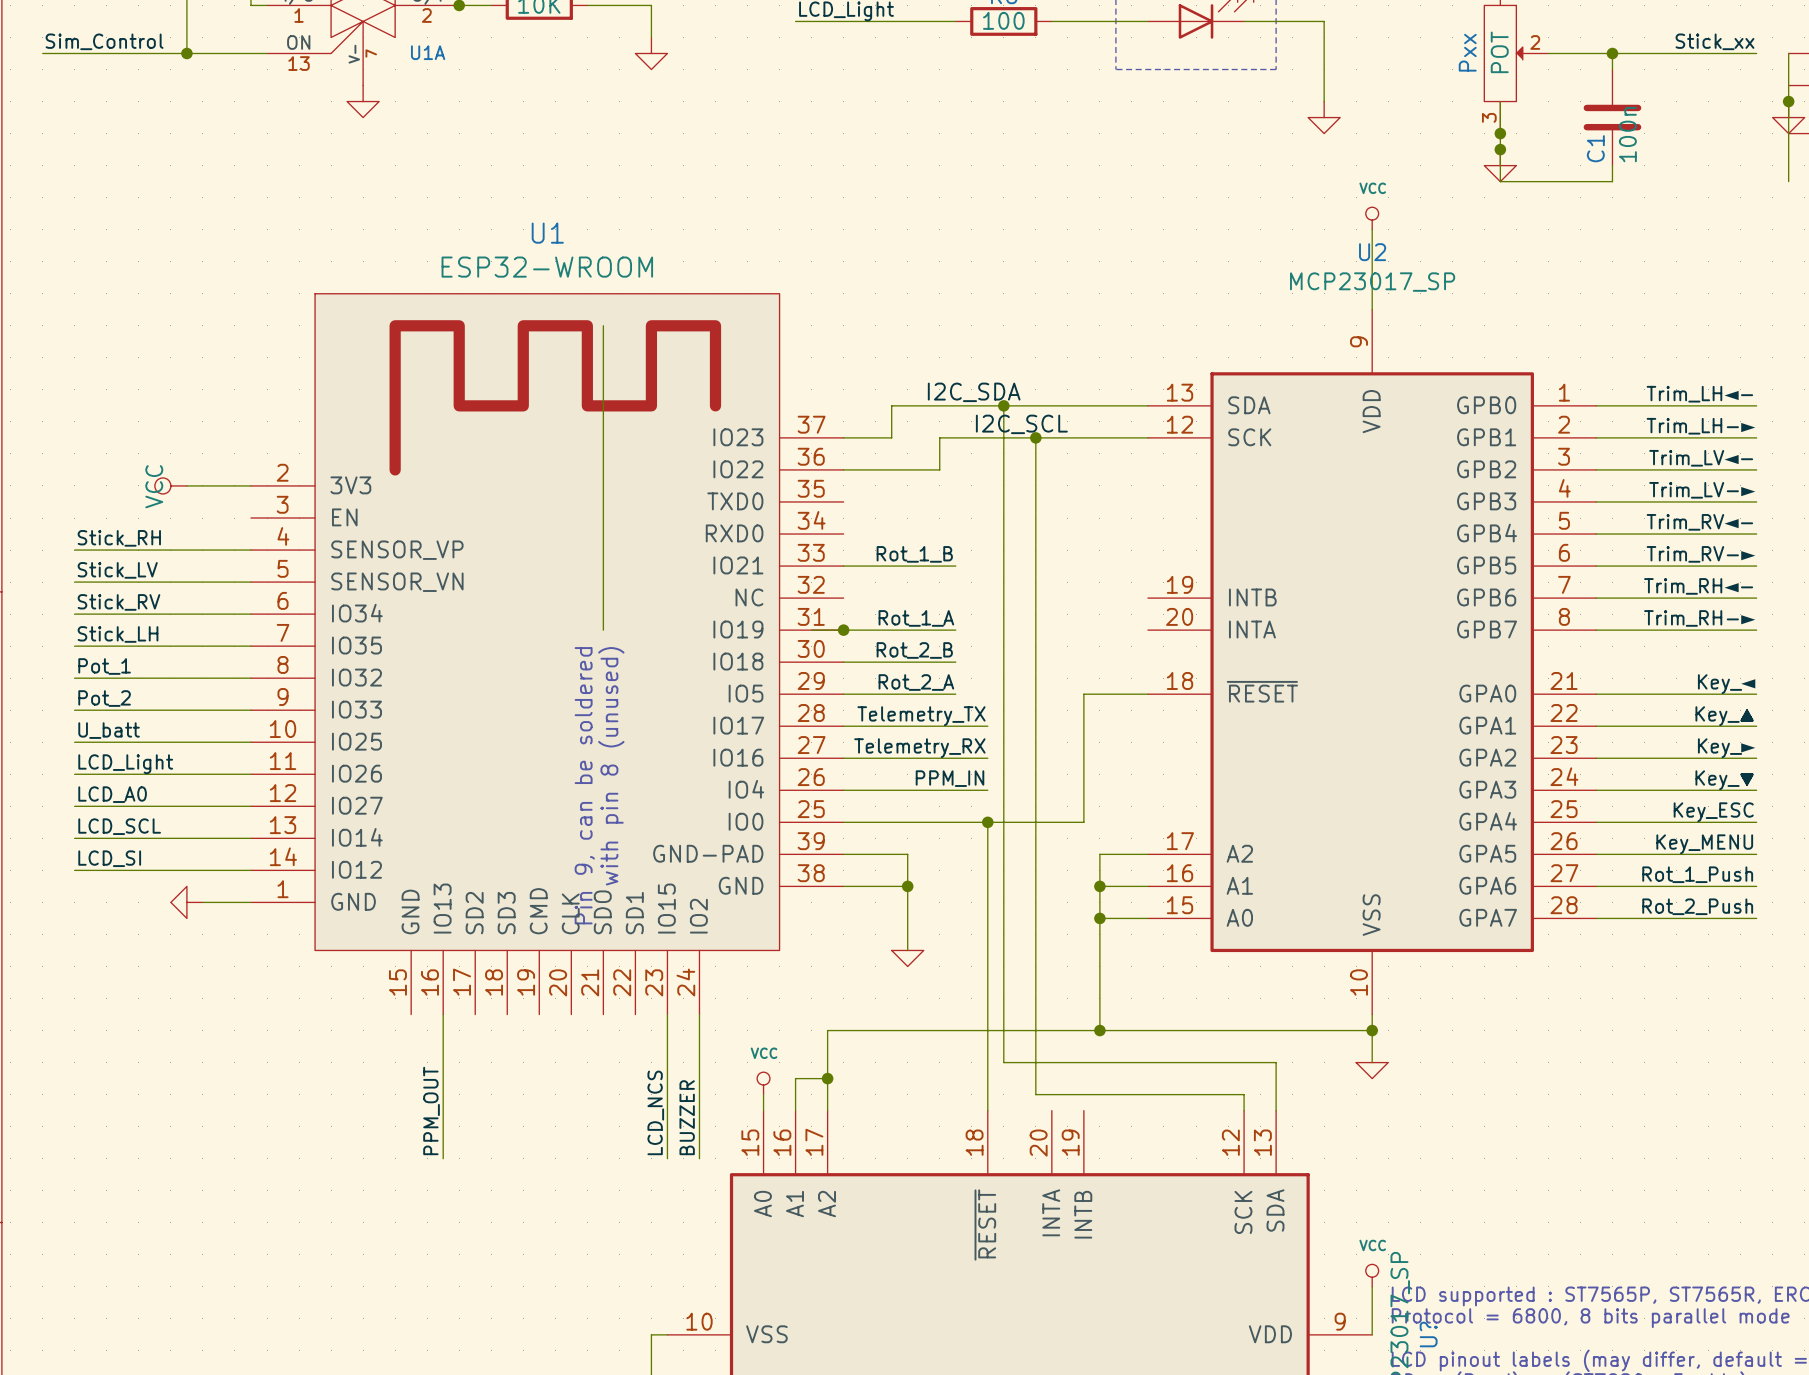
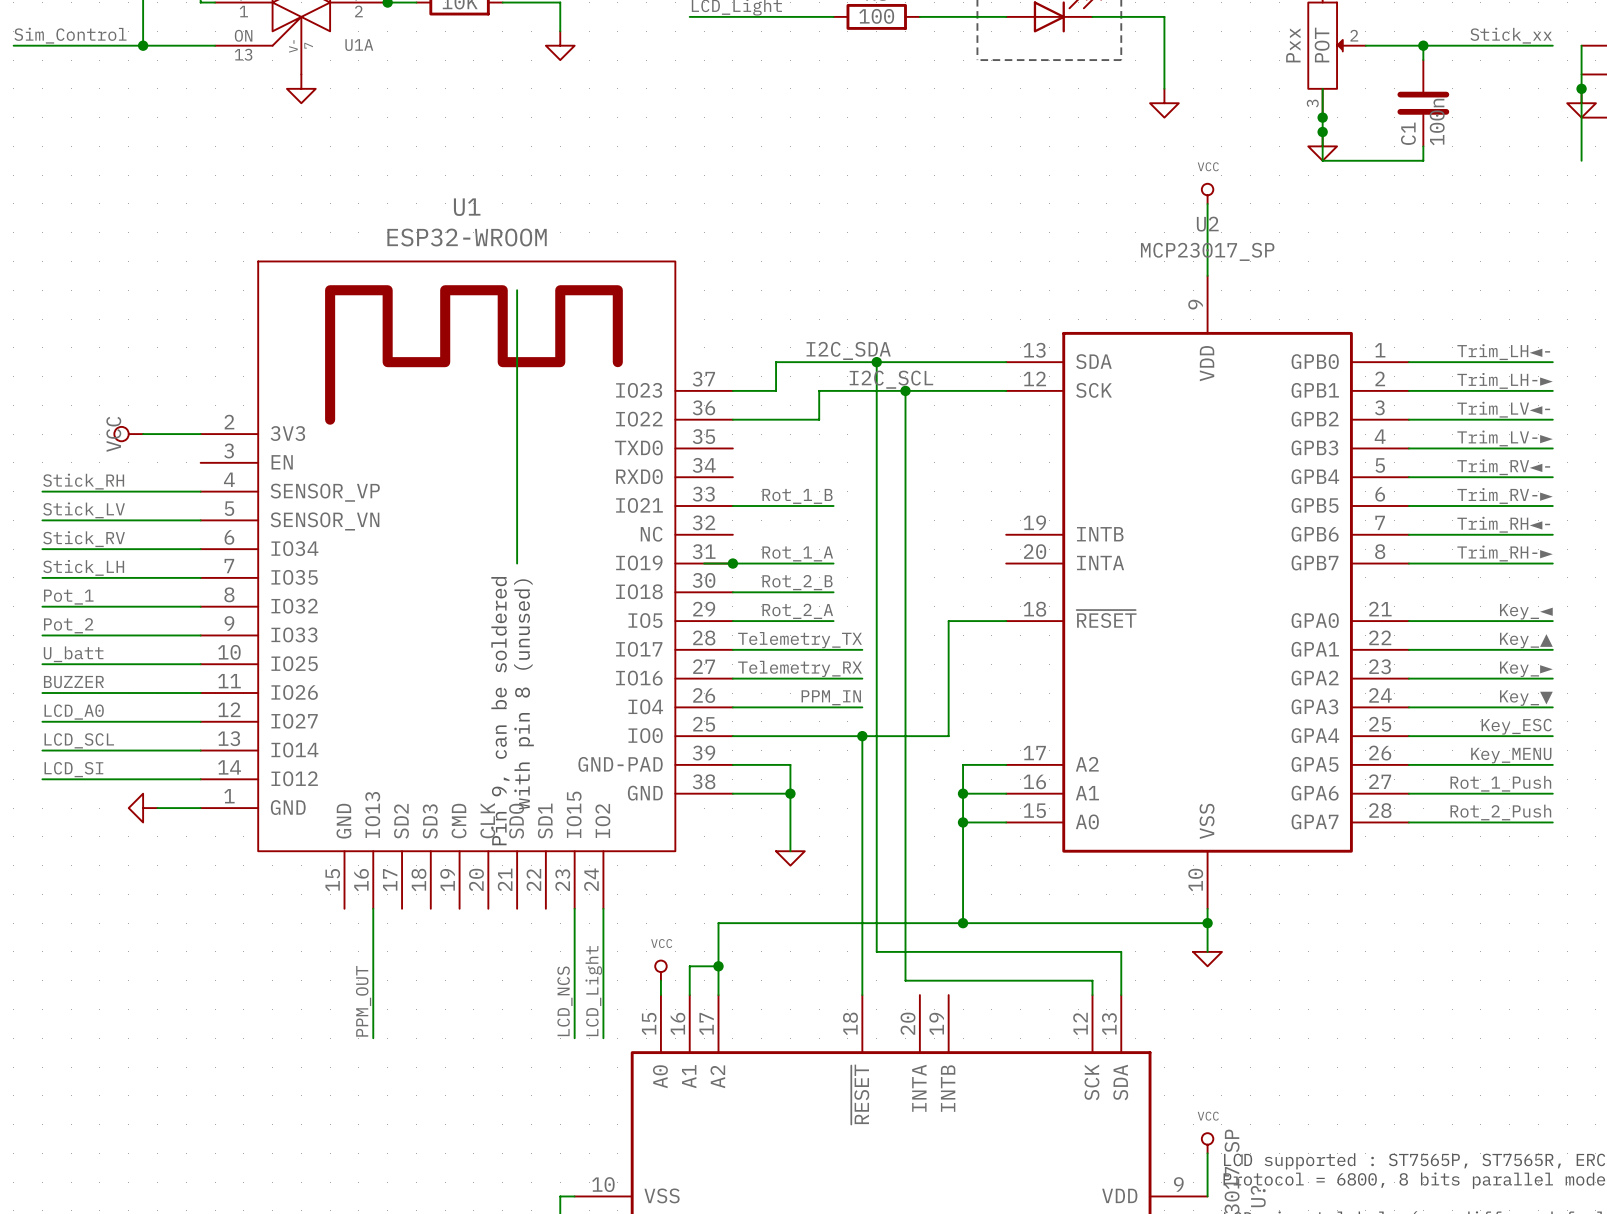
label: LCD_Light (125, 764) -> BUZZER (73, 682)
label: BUZZER (687, 1117) -> LCD_Light (593, 991)

